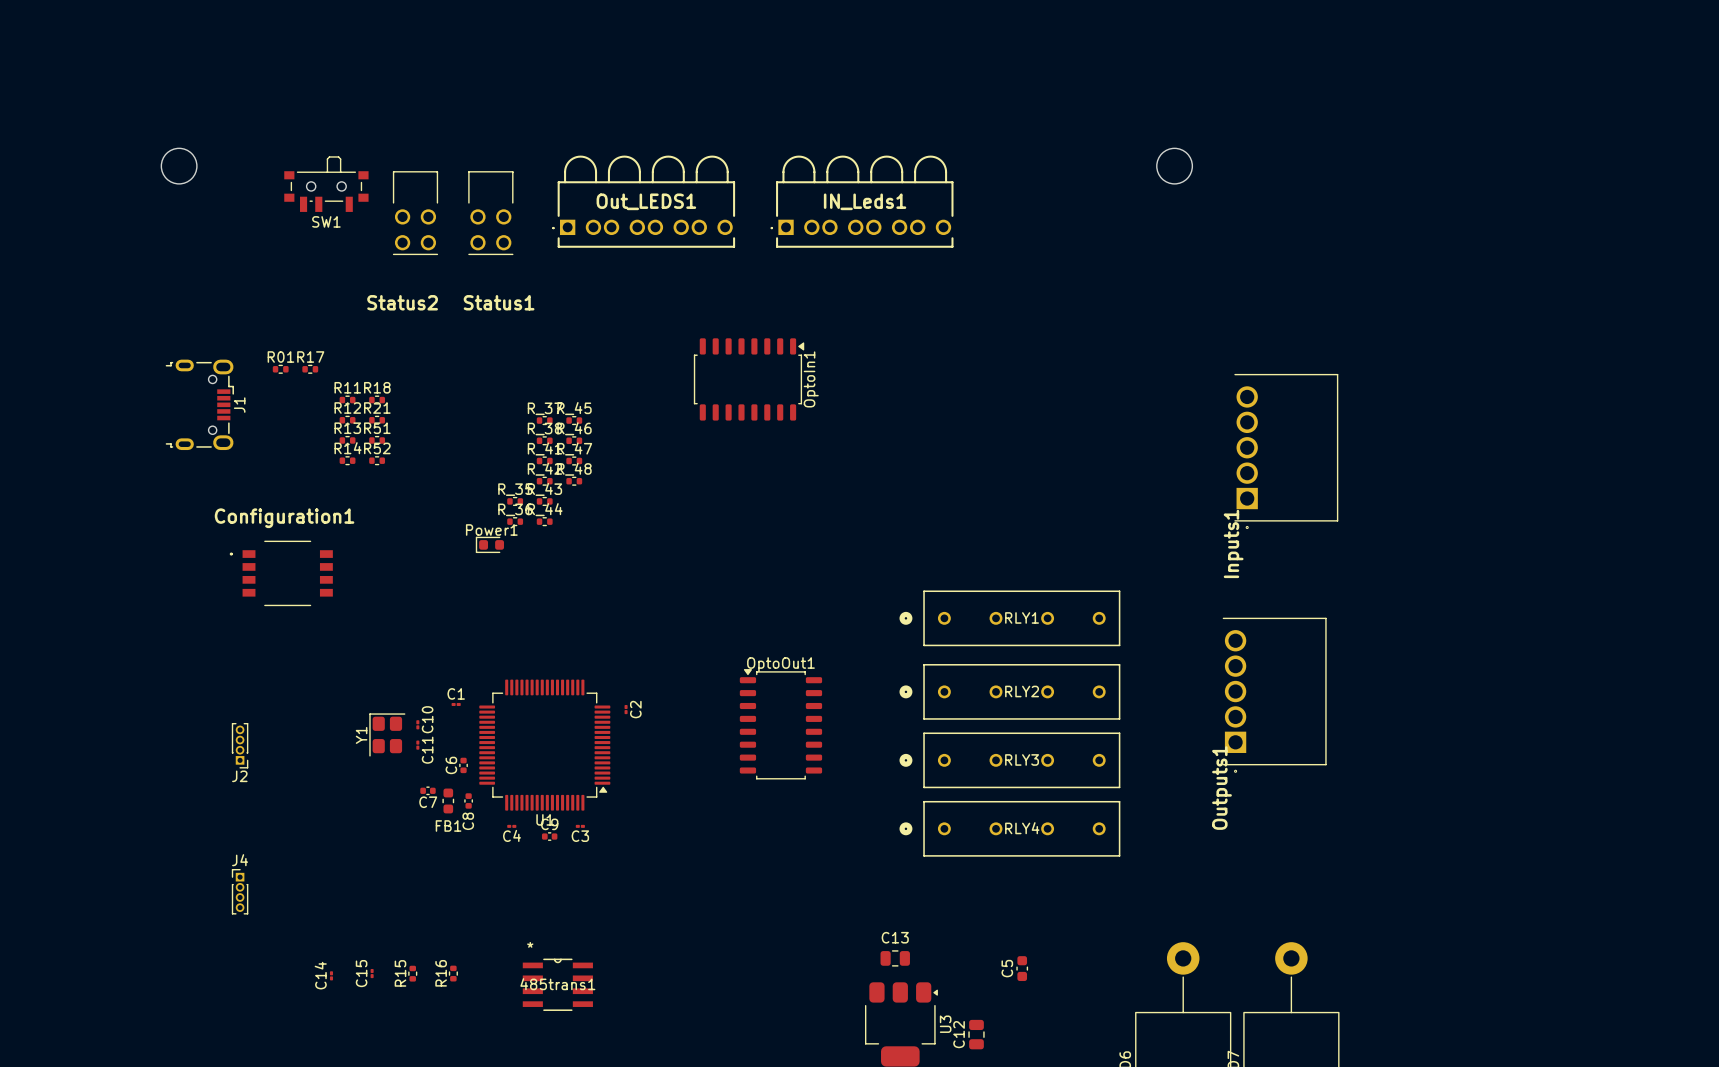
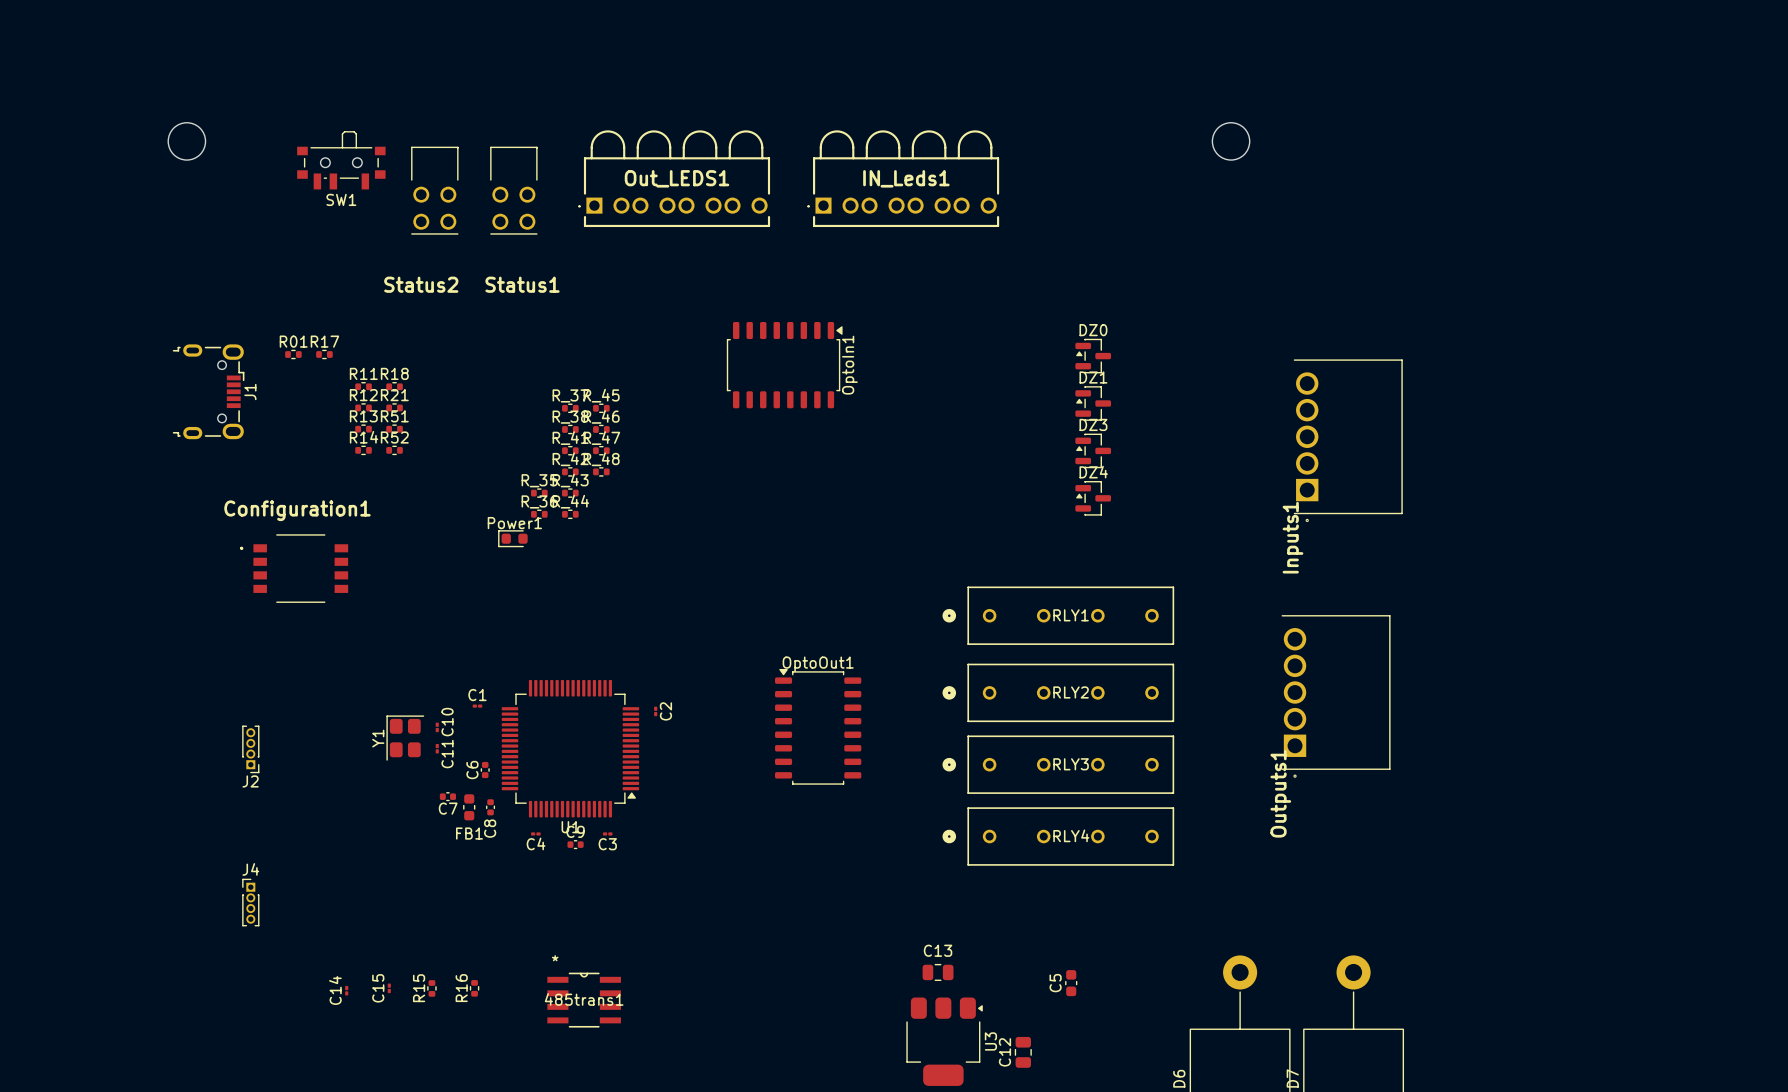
DZ0: none -> (1093, 356)
DZ1: none -> (1093, 403)
DZ3: none -> (1093, 450)
DZ4: none -> (1093, 498)

